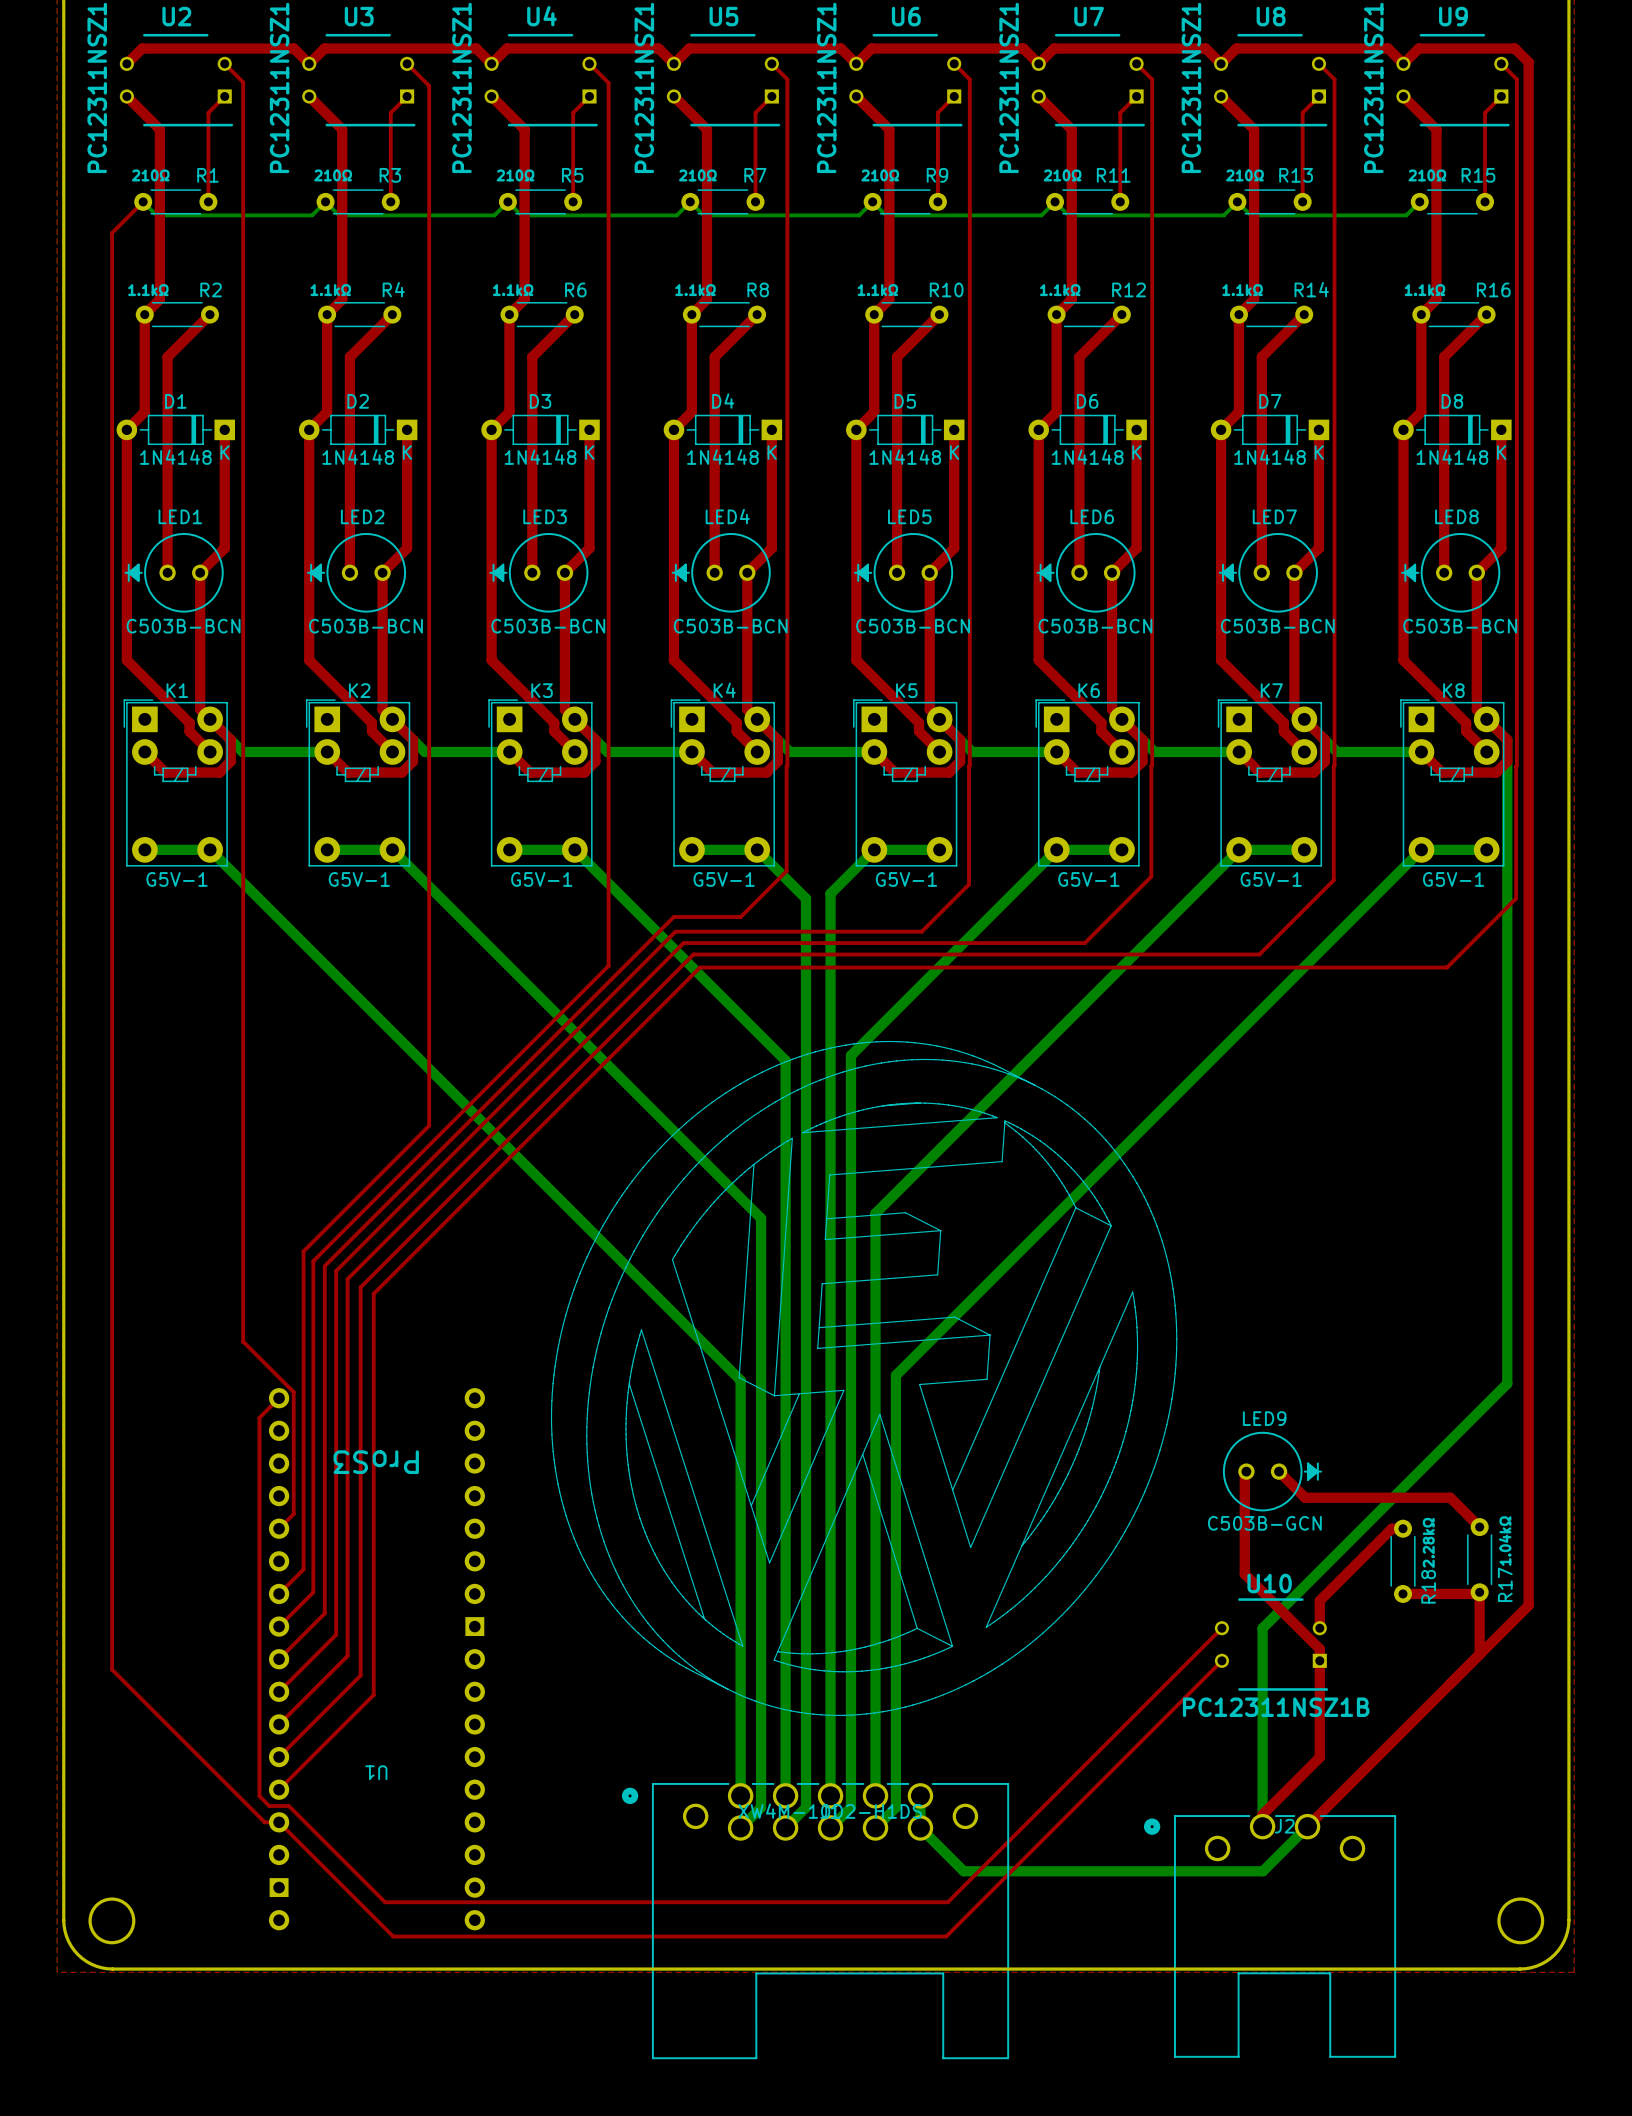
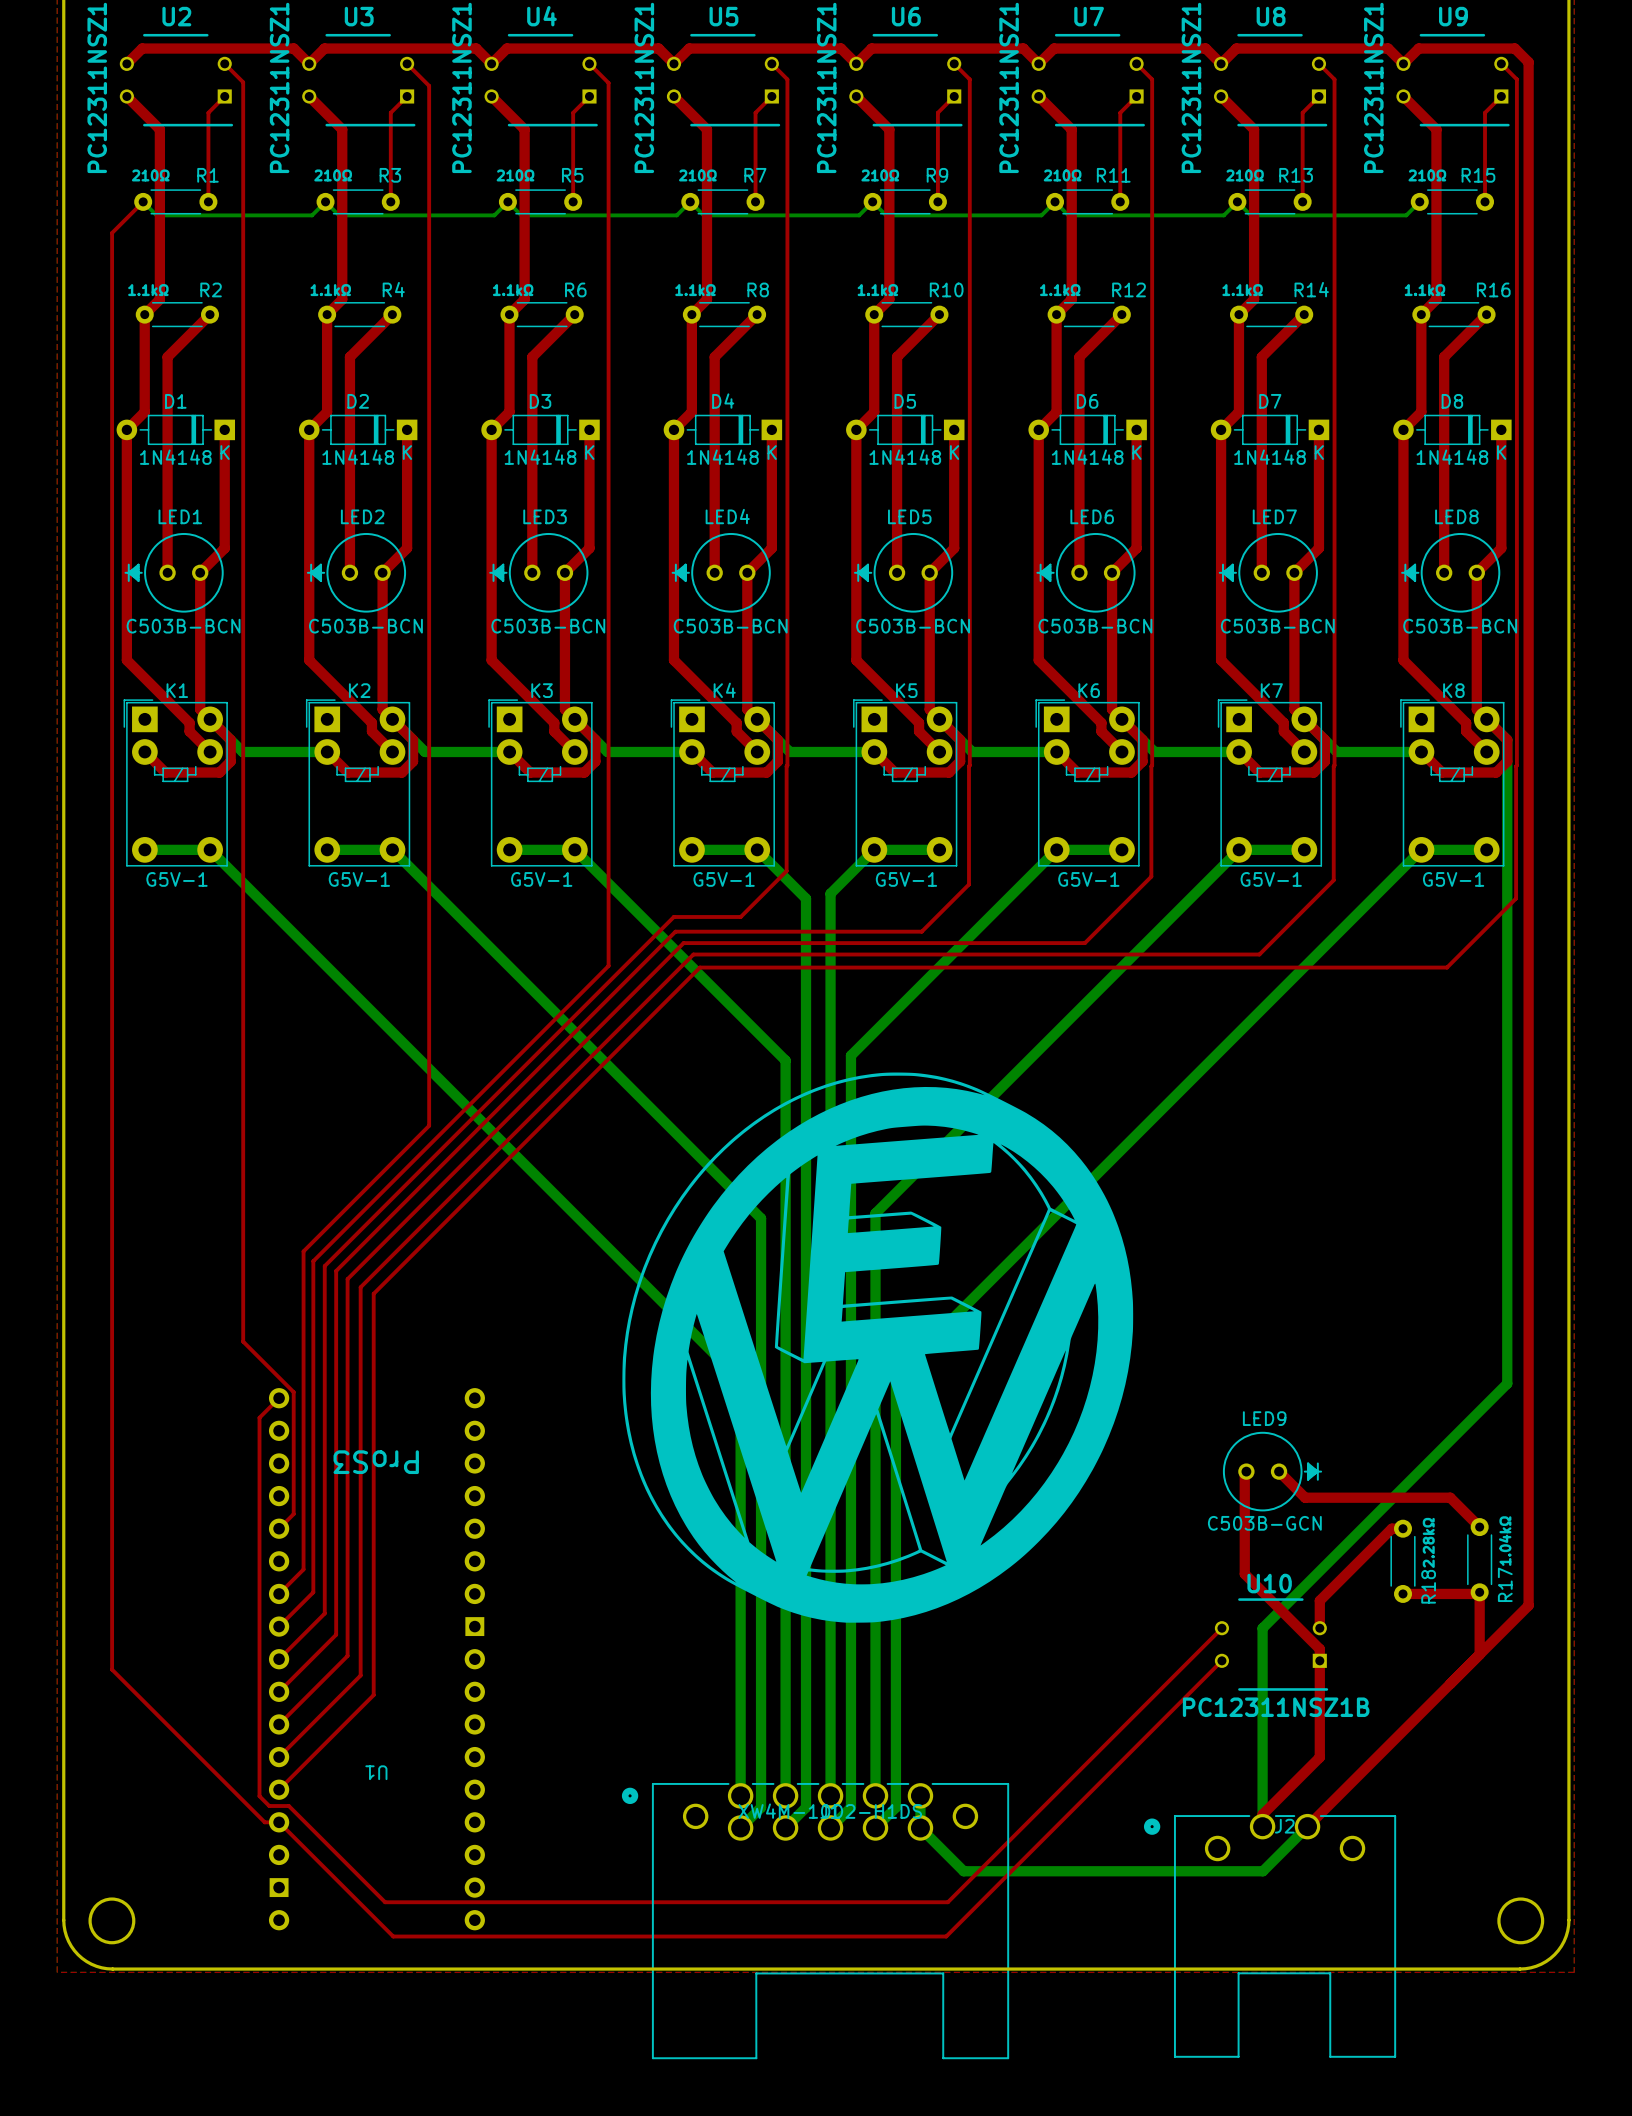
line: (927, 1059) (957, 1061) (987, 1067) (1015, 1076) (1042, 1089) (1084, 1118) (1105, 1140) (1124, 1163) (1140, 1190) (1154, 1218) (1164, 1248) (1171, 1280) (1175, 1313) (1176, 1347) (1174, 1381) (1168, 1416) (1160, 1450) (1148, 1483) (1133, 1515) (1116, 1546) (1096, 1575) (1073, 1602) (1049, 1627) (1022, 1649) (995, 1668) (965, 1684) (935, 1697) (905, 1707) (874, 1712) (843, 1715) (813, 1714) (783, 1709) (734, 1692) (690, 1665) (652, 1629) (622, 1584) (601, 1533) (589, 1477) (587, 1418) (594, 1358) (612, 1299) (638, 1243) (672, 1192) (714, 1147) (761, 1110) (812, 1083) (865, 1066) (896, 1060) (927, 1059) -> none
line: (1035, 1085) (973, 1055) (922, 1043) (869, 1042) (838, 1046) (807, 1054) (777, 1065) (747, 1079) (719, 1097) (691, 1118) (666, 1141) (643, 1167) (607, 1217) (590, 1249) (576, 1281) (565, 1315) (557, 1349) (553, 1383) (551, 1417) (553, 1451) (558, 1484) (566, 1515) (577, 1545) (591, 1573) (608, 1599) (643, 1638) (667, 1656) (692, 1671) -> none
line: (915, 1103) (957, 1106) (997, 1117) (802, 1132) (830, 1120) (858, 1111) (887, 1105) (915, 1103) -> none
line: (919, 1103) (883, 1105) -> none
line: (1004, 1122) (1026, 1140) (1045, 1160) (1061, 1182) (1075, 1207) -> none
line: (753, 1164) (739, 1377) (774, 1395) -> none
line: (1075, 1207) (952, 1489) -> none
line: (1075, 1207) (1111, 1225) -> none
line: (826, 1218) (905, 1212) (940, 1230) -> none
line: (1111, 1225) (970, 1547) (919, 1384) (987, 1379) (990, 1335) -> none
line: (1111, 1225) (1091, 1193) (1068, 1164) (1036, 1138) (1004, 1120) (1002, 1161) (829, 1174) (825, 1239) (940, 1230) -> none
line: (940, 1230) (937, 1274) (822, 1283) (817, 1348) (990, 1335) -> none
line: (1132, 1292) (986, 1627) (1023, 1598) (1056, 1564) (1085, 1525) (1110, 1477) (1125, 1431) (1135, 1384) (1137, 1337) (1132, 1292) -> none
line: (819, 1327) (954, 1317) (990, 1335) -> none
line: (641, 1329) (630, 1376) (626, 1423) (628, 1469) (638, 1513) (654, 1554) (677, 1589) (705, 1620) (742, 1646) (641, 1329) -> none
part: none -> (877, 1347)
line: (1099, 1367) (1089, 1418) (1072, 1464) (1049, 1507) (1021, 1546) -> none
line: (629, 1383) (704, 1618) -> none
line: (799, 1393) (751, 1505) -> none
line: (774, 1395) (792, 1138) (757, 1161) (725, 1190) (696, 1223) (672, 1259) (769, 1562) (843, 1390) (774, 1395) -> none
line: (862, 1454) (917, 1628) -> none
line: (917, 1628) (952, 1646) -> none
line: (917, 1628) (884, 1641) (846, 1650) (812, 1653) (777, 1651) -> none
line: (952, 1646) (905, 1663) (862, 1671) (814, 1669) (774, 1660) (879, 1414) (952, 1646) -> none
line: (692, 1671) (728, 1689) -> none

